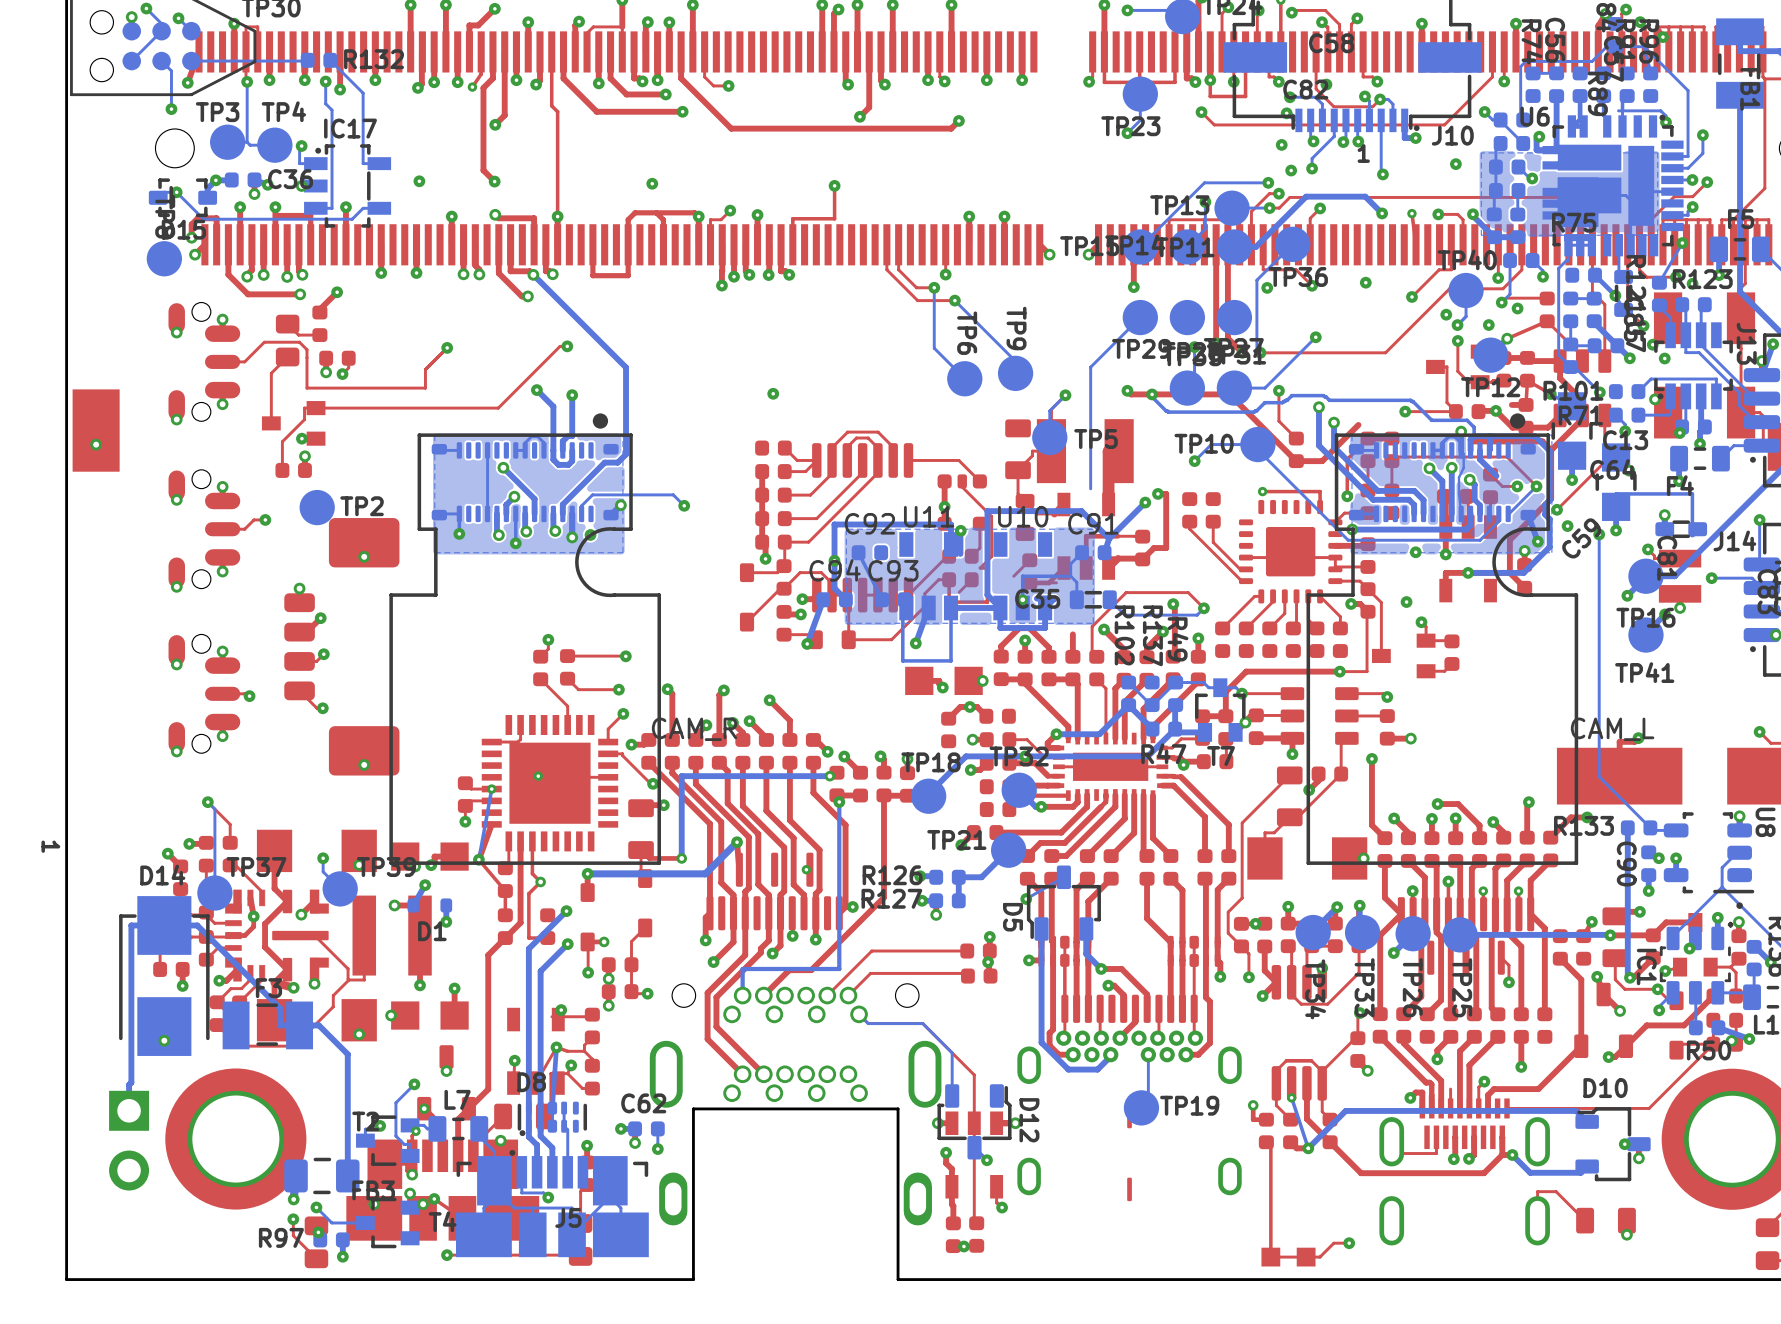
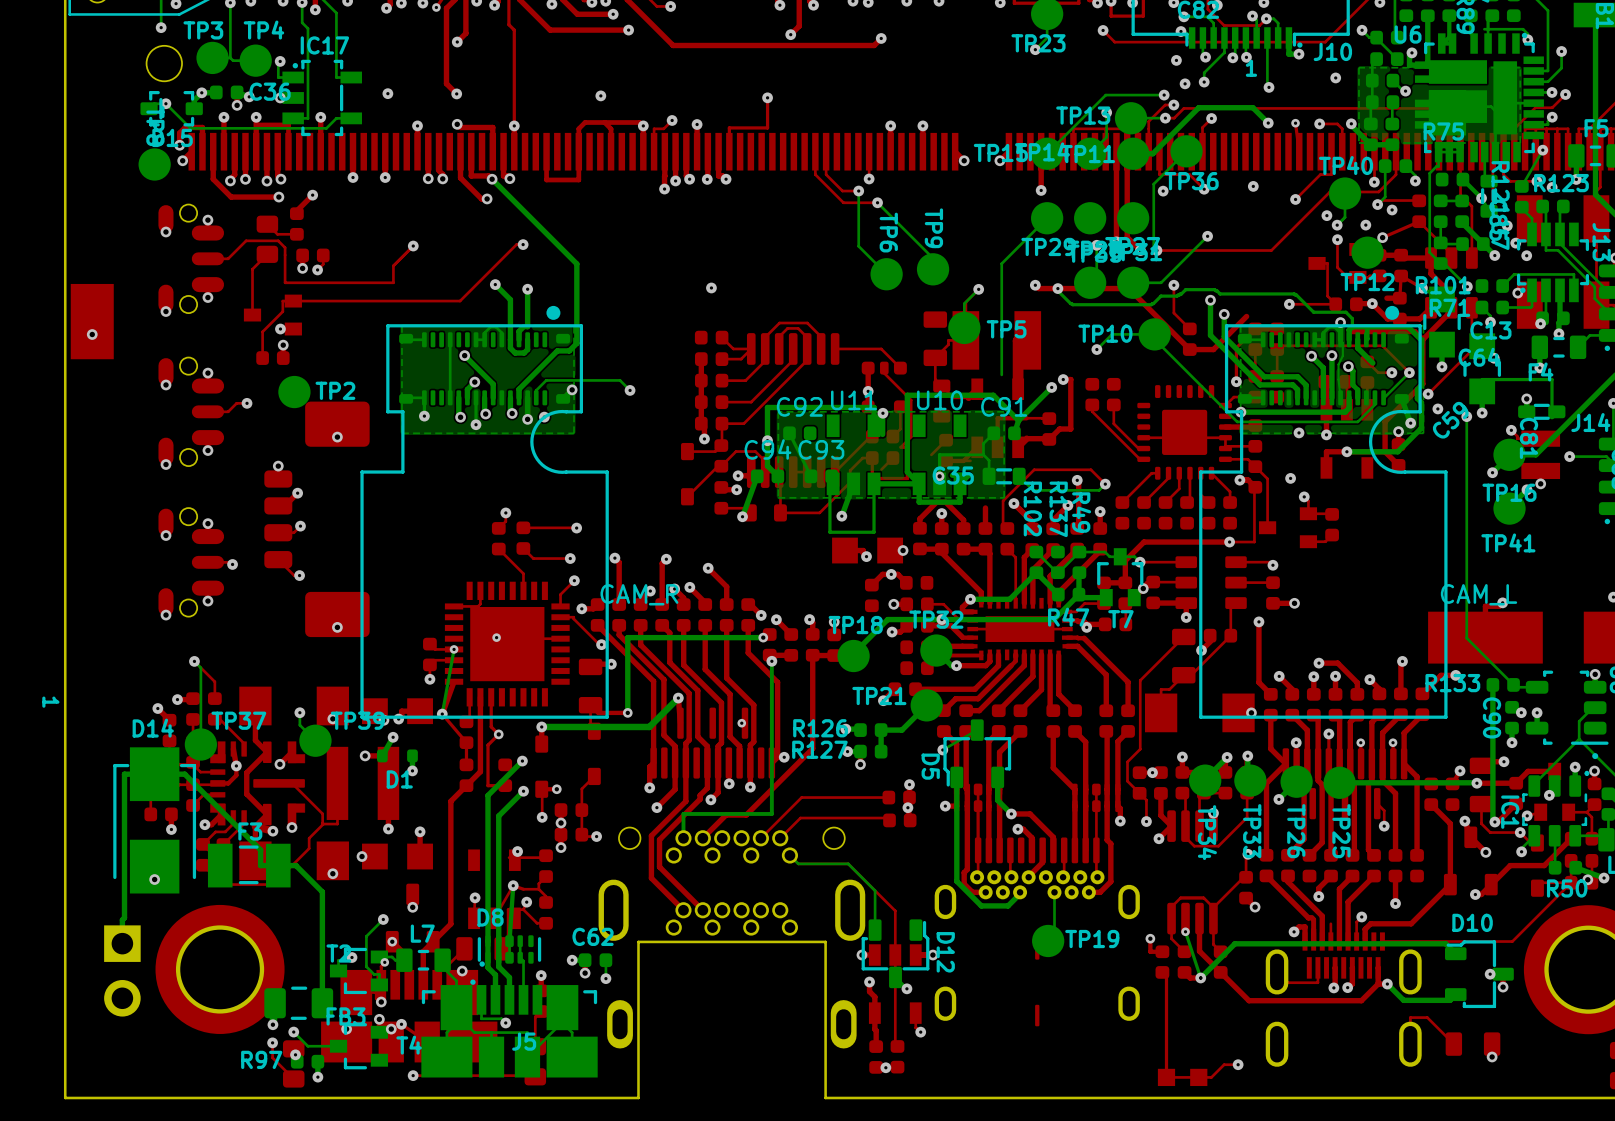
top track: (1262, 491) (1320, 491) (1320, 507) -> none
via: (1262, 491) -> none

